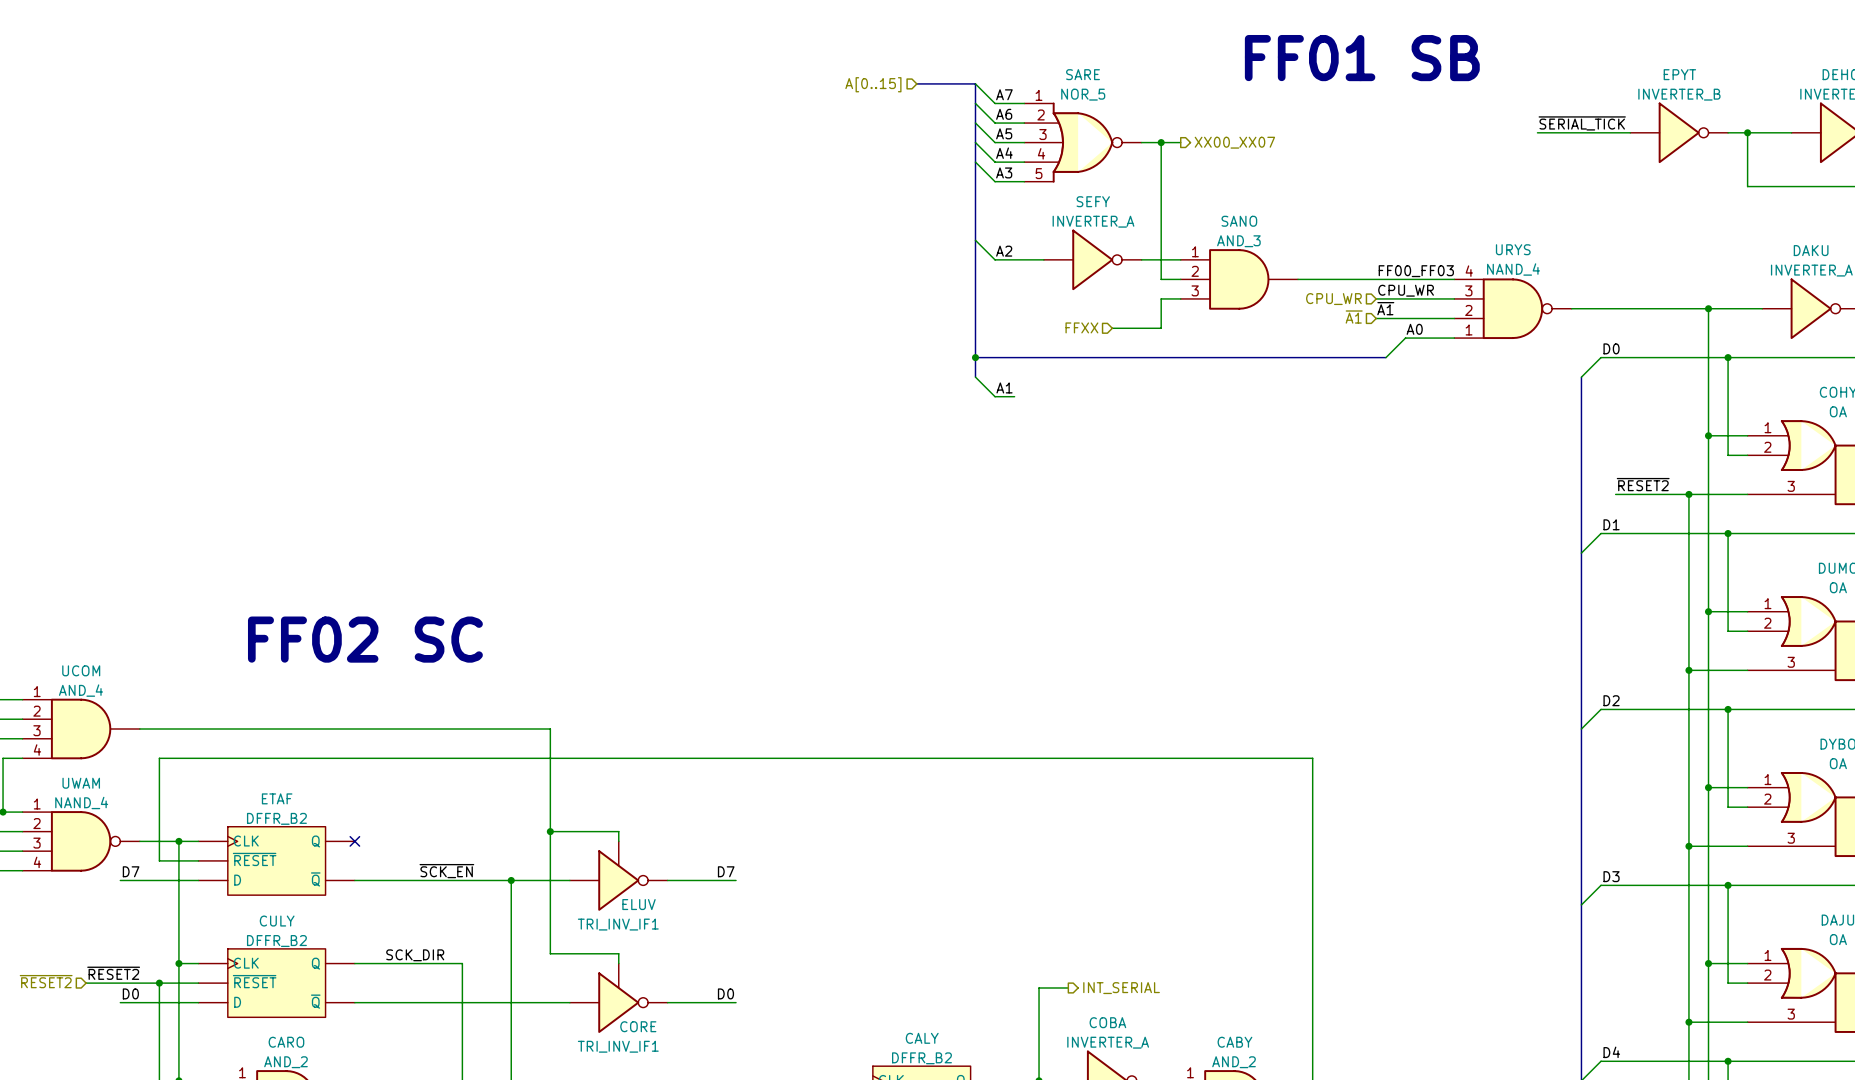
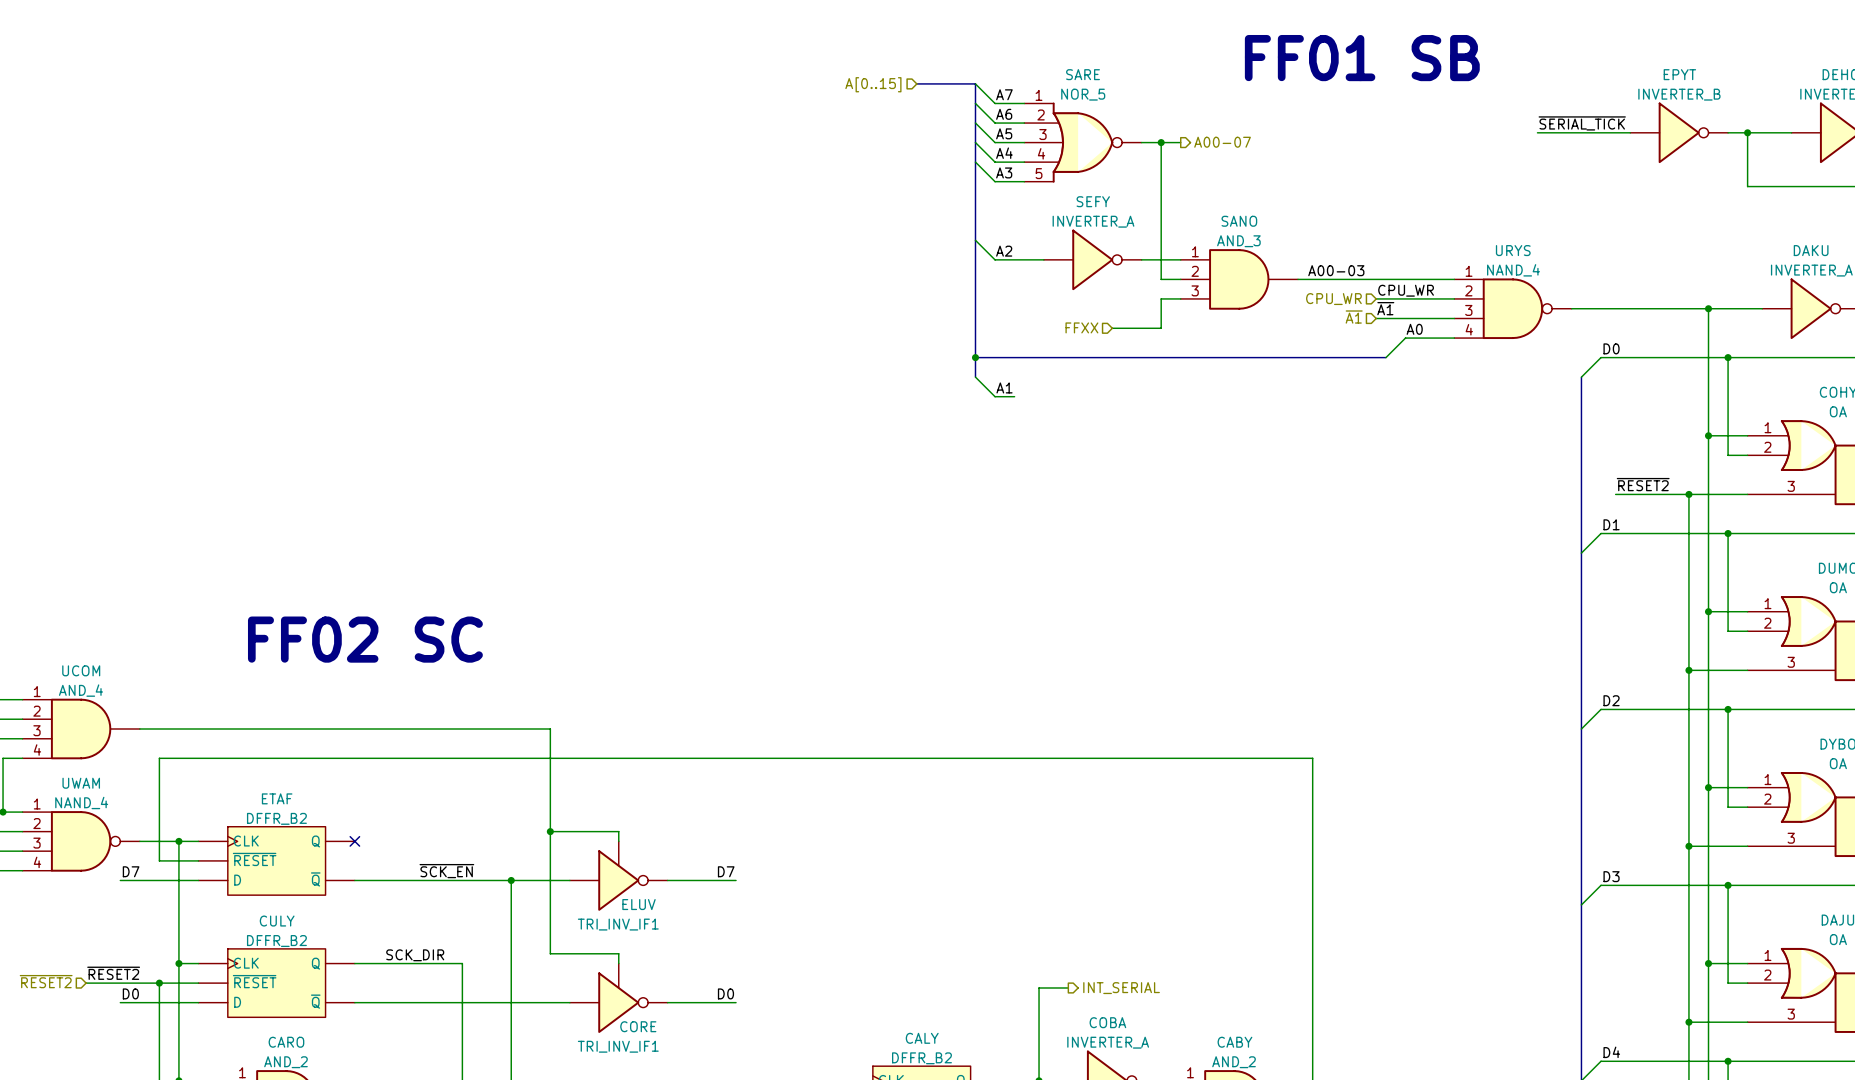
hierarchical label: XX00_XX07 (1234, 142) -> A00-07 (1222, 142)
label: none -> A00-03 (1336, 270)
label: FF00_FF03 (1416, 271) -> none
URYS flip: as is (1512, 308) -> up-down (1512, 308)

